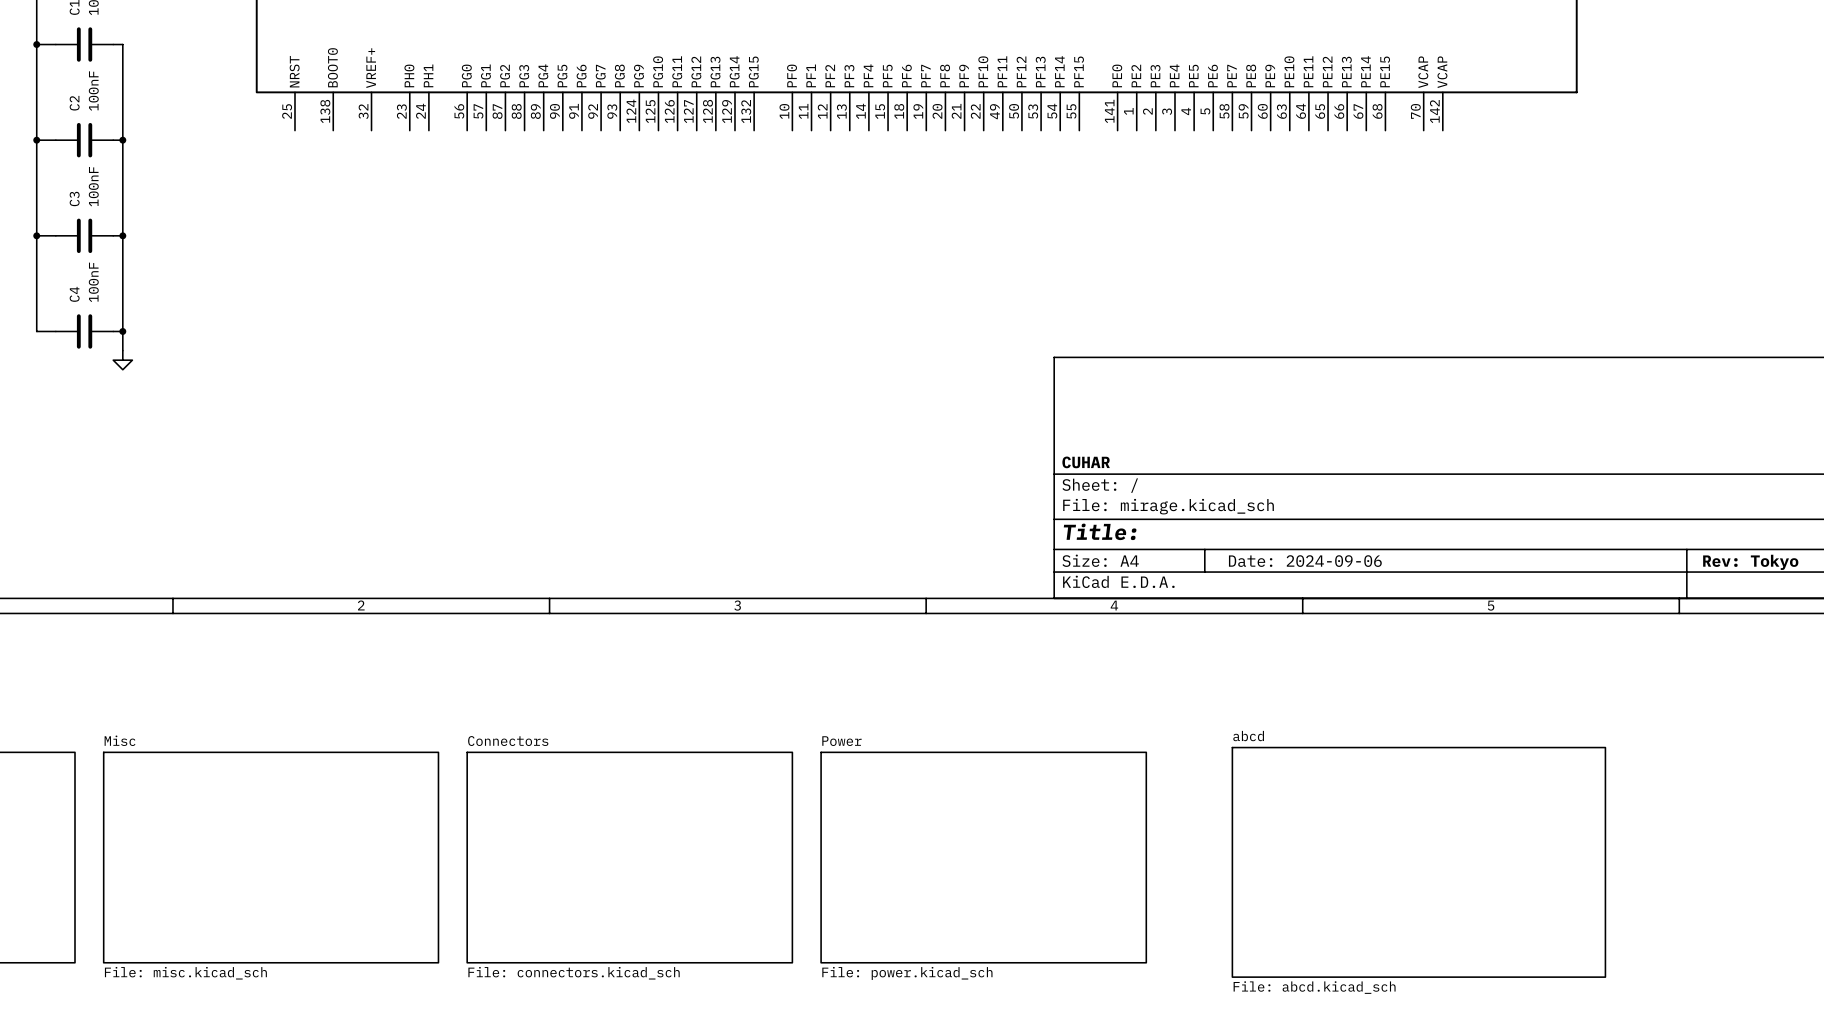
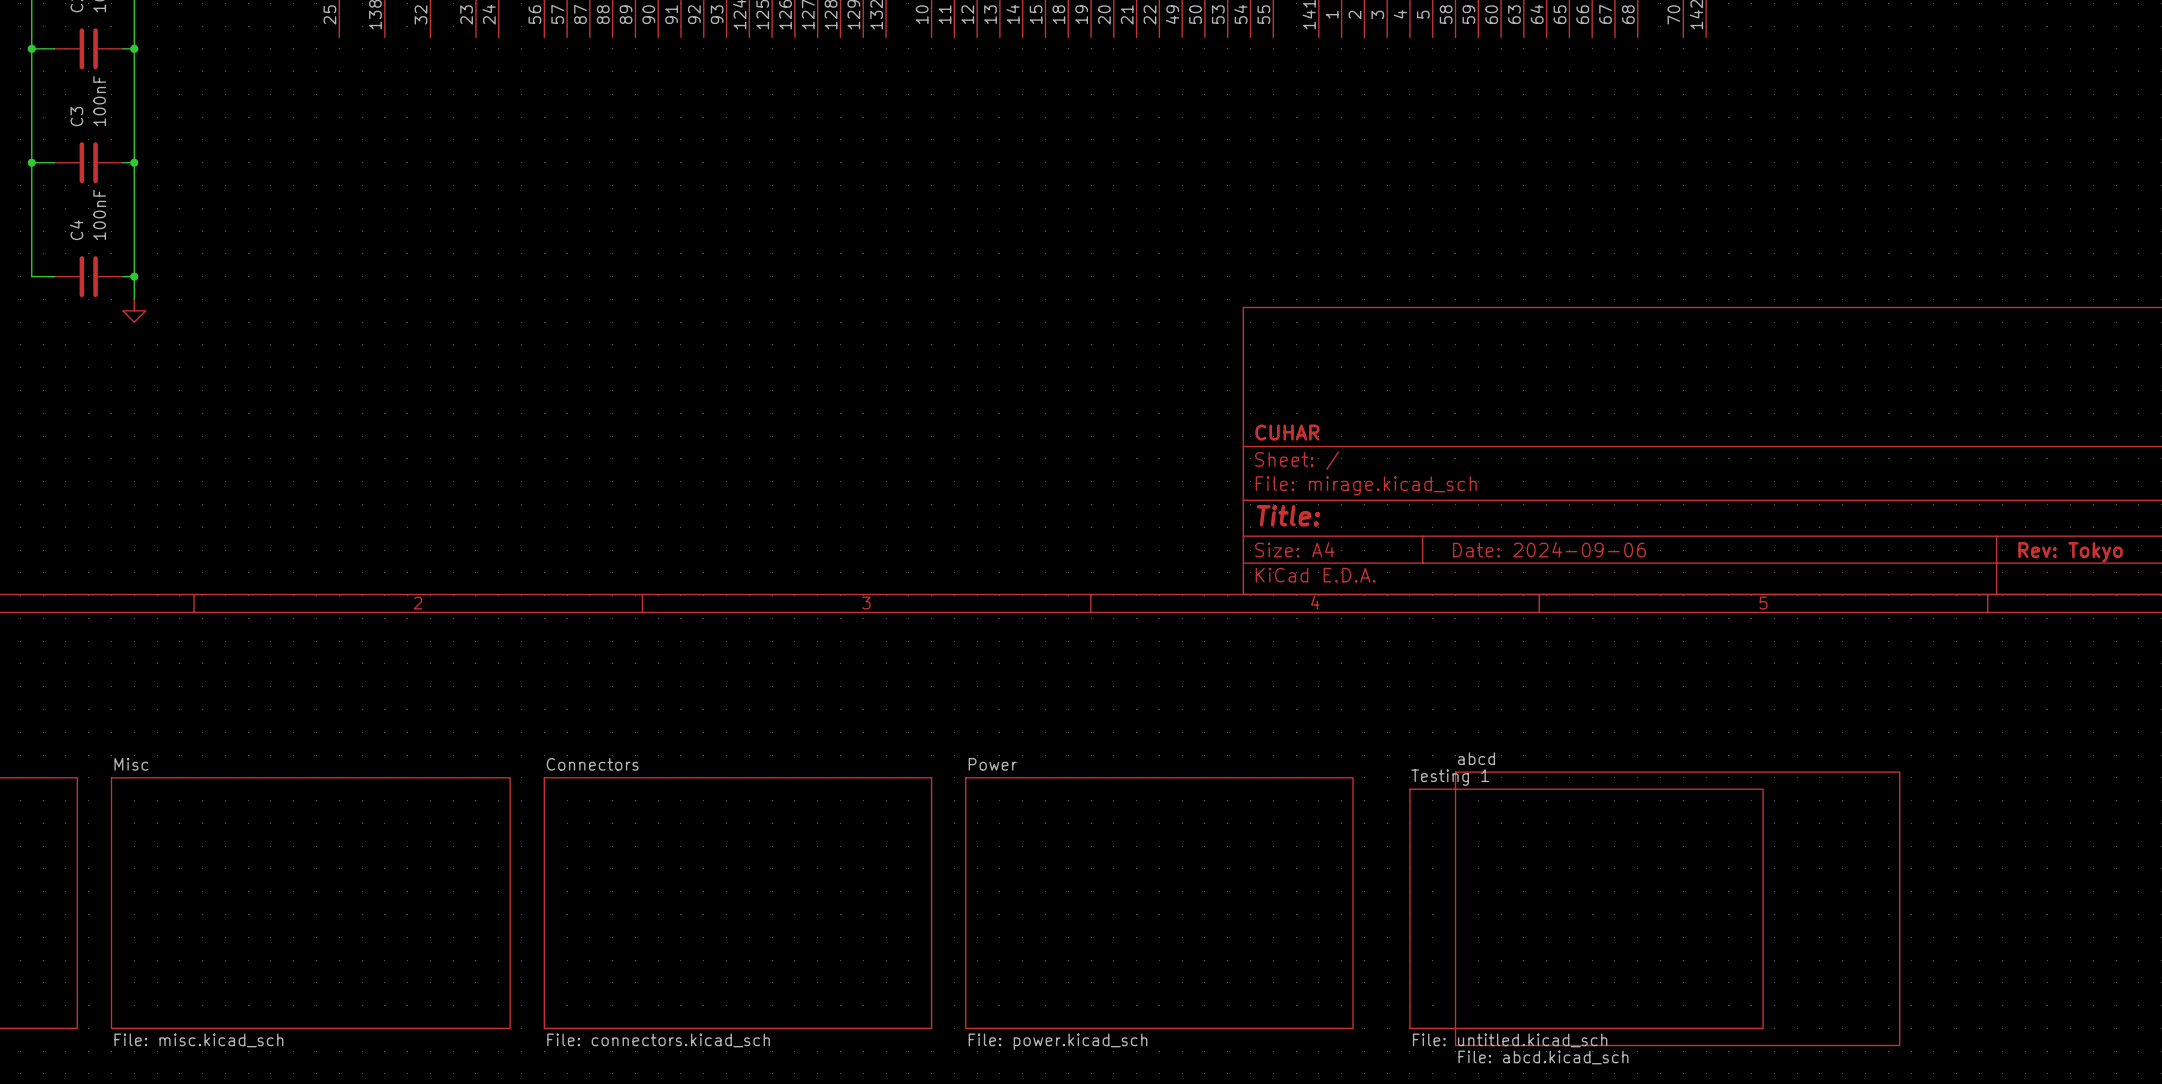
sheet Testing 1: none -> File: untitled.kicad_sch (1586, 908)

